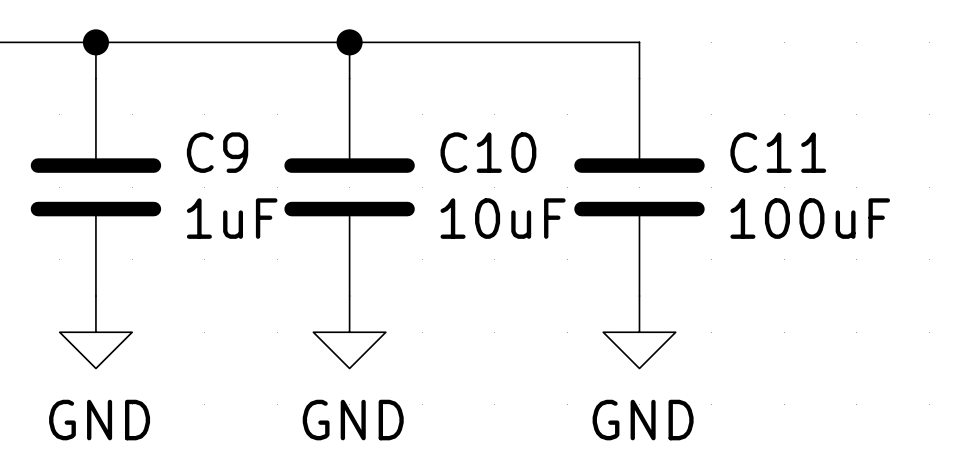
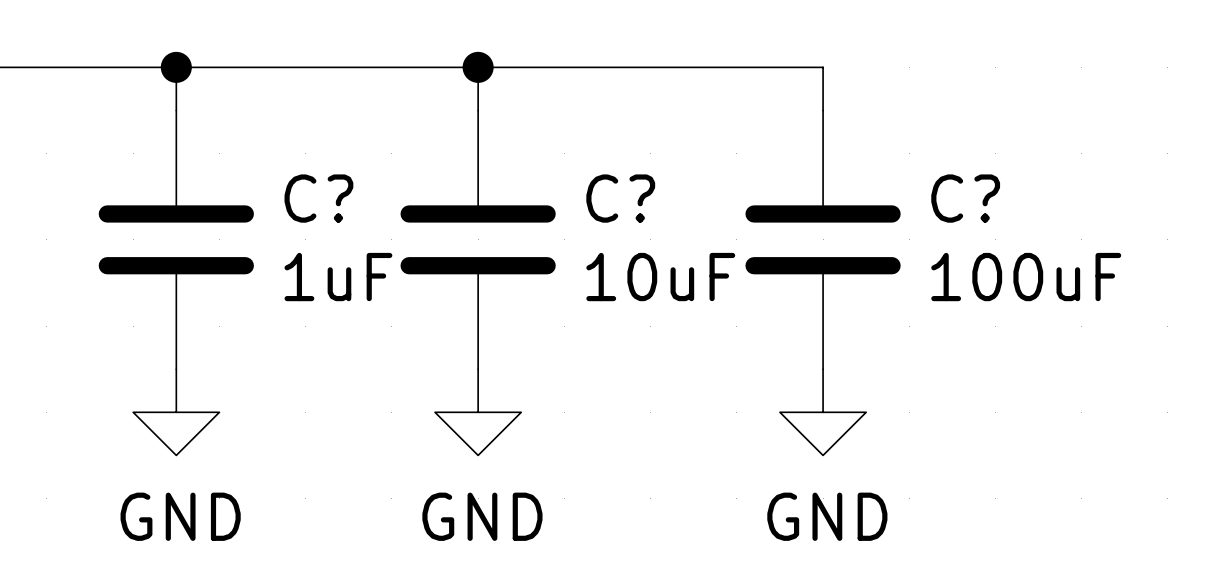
C9 name: C9 (217, 152) -> C? (318, 198)
C10 name: C10 (488, 152) -> C? (620, 198)
C11 name: C11 (778, 152) -> C? (965, 198)

